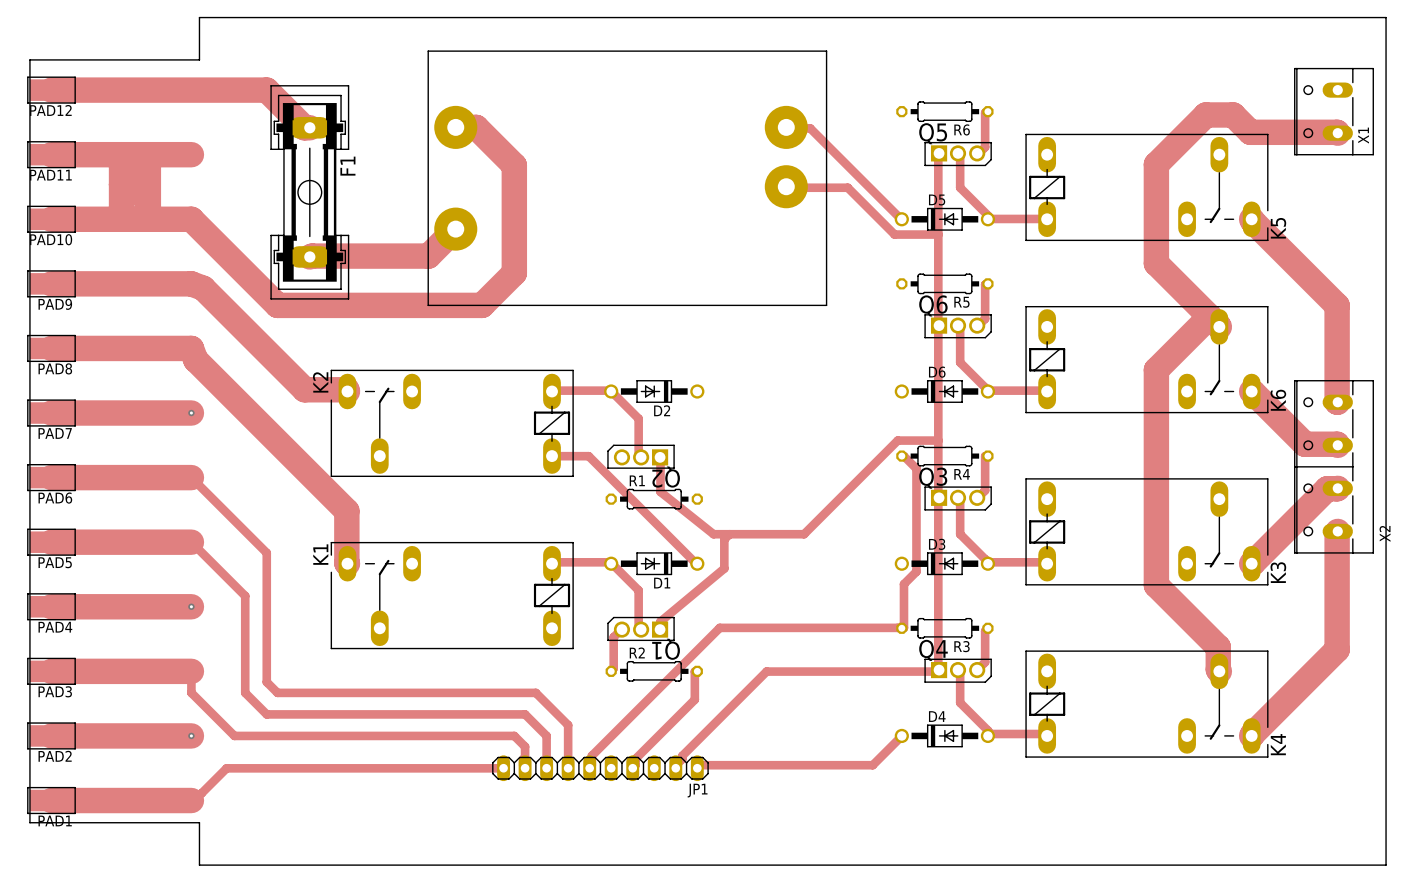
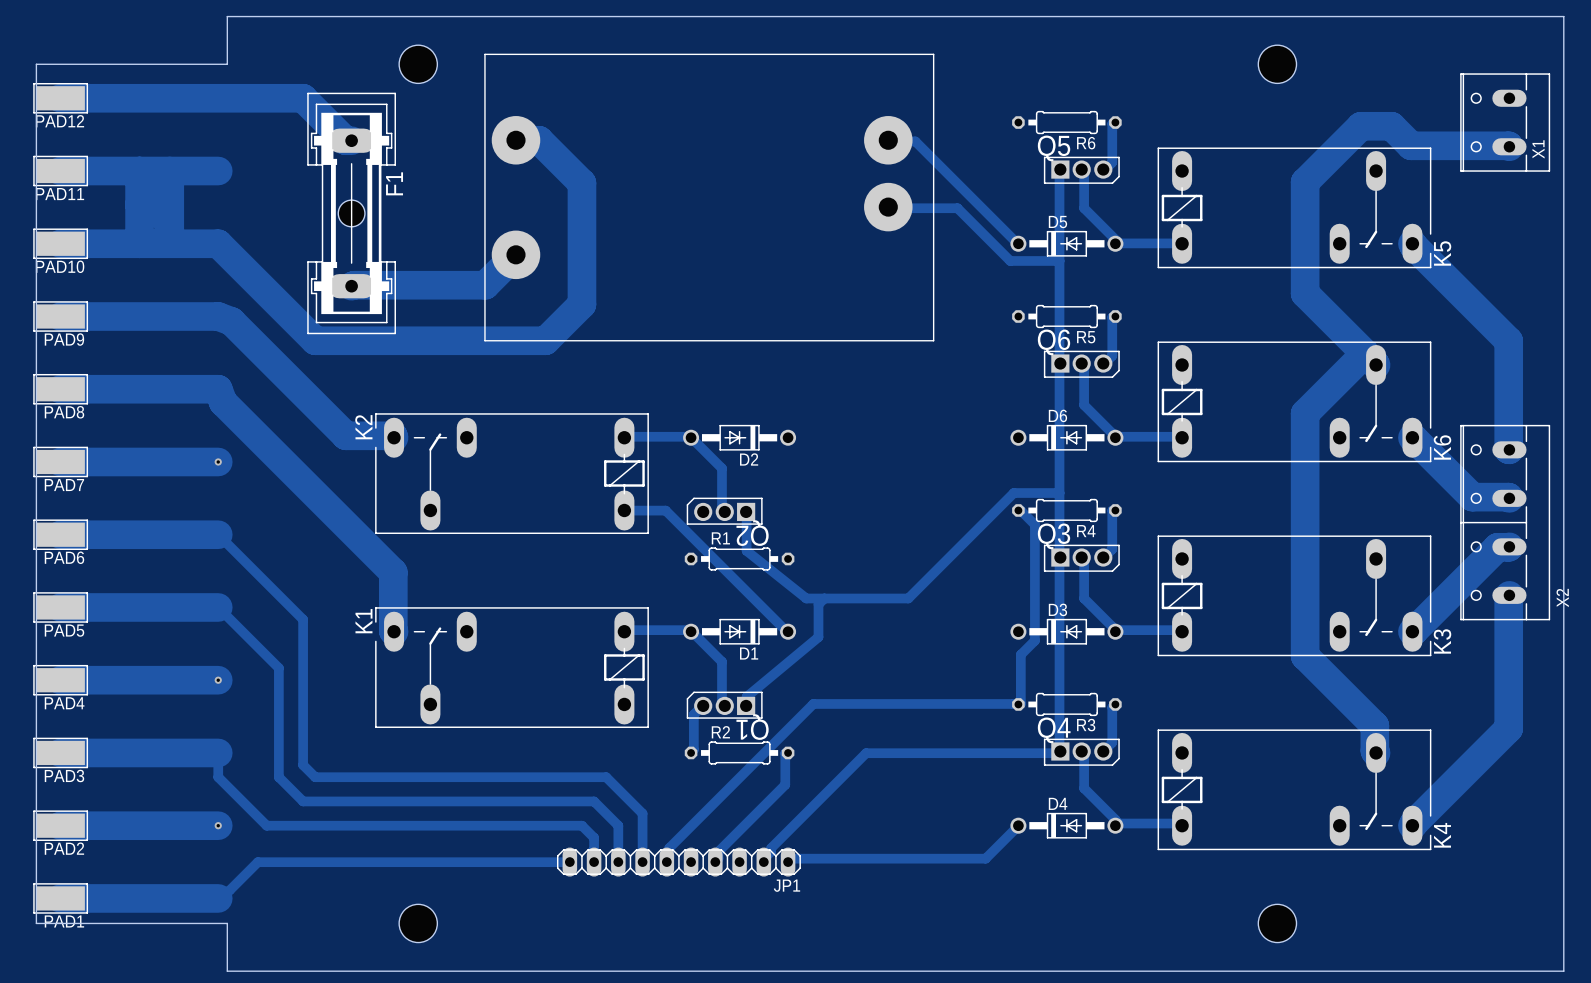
hole: none -> (418, 64)
hole: none -> (1277, 64)
hole: none -> (418, 923)
hole: none -> (1277, 923)

